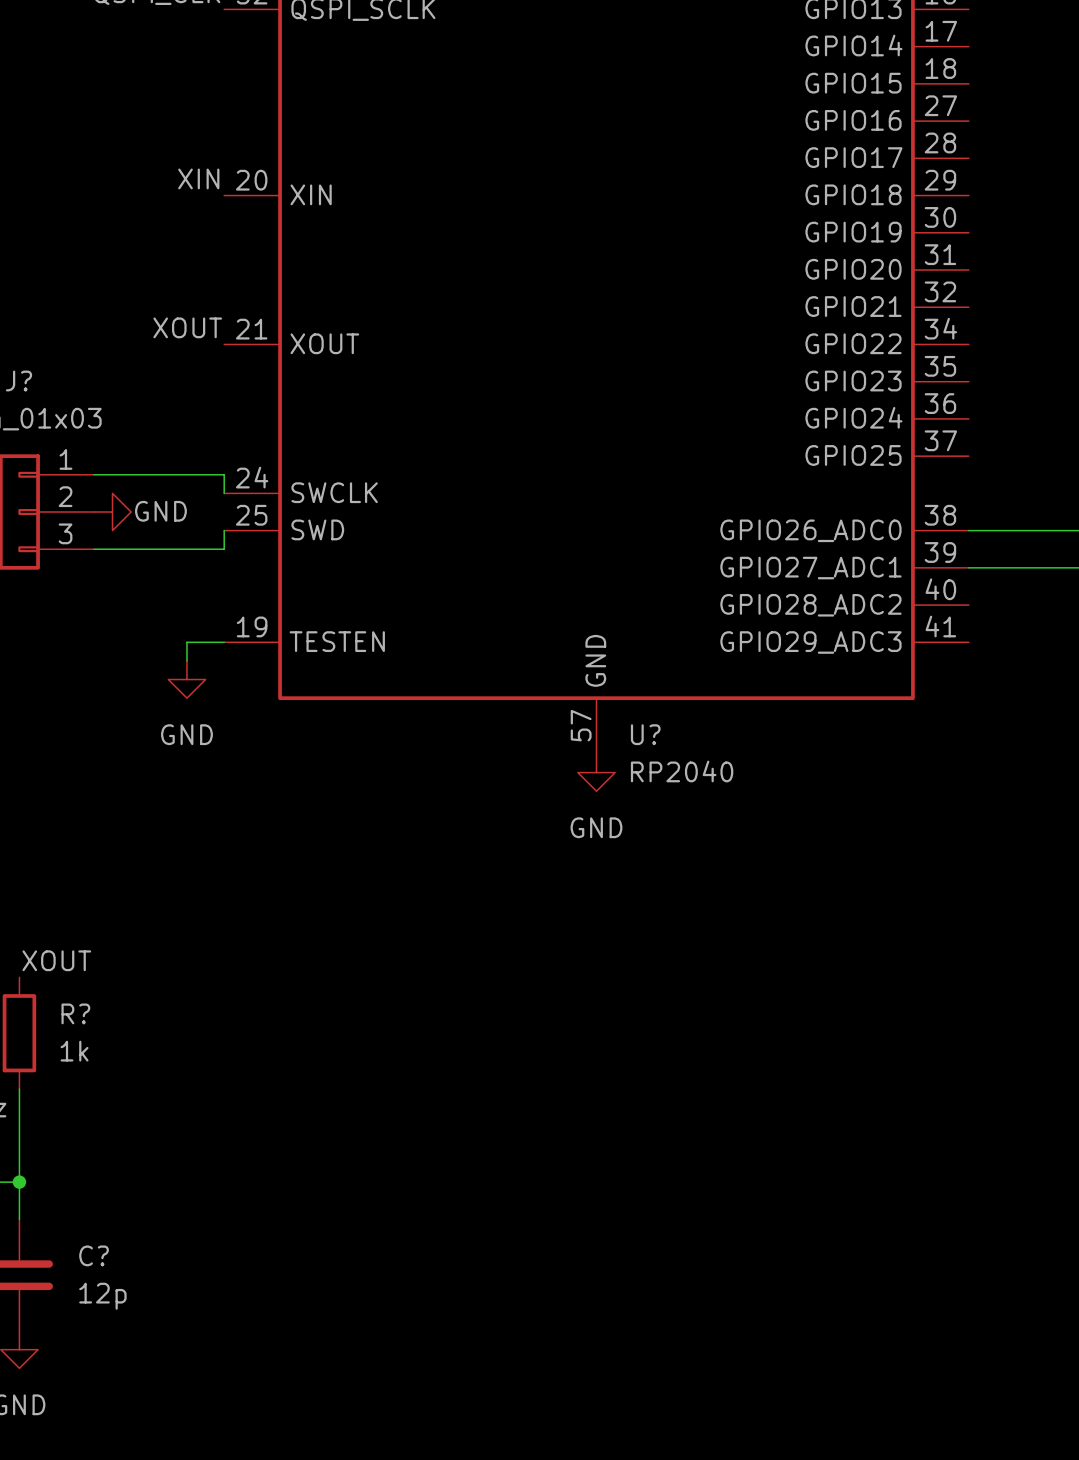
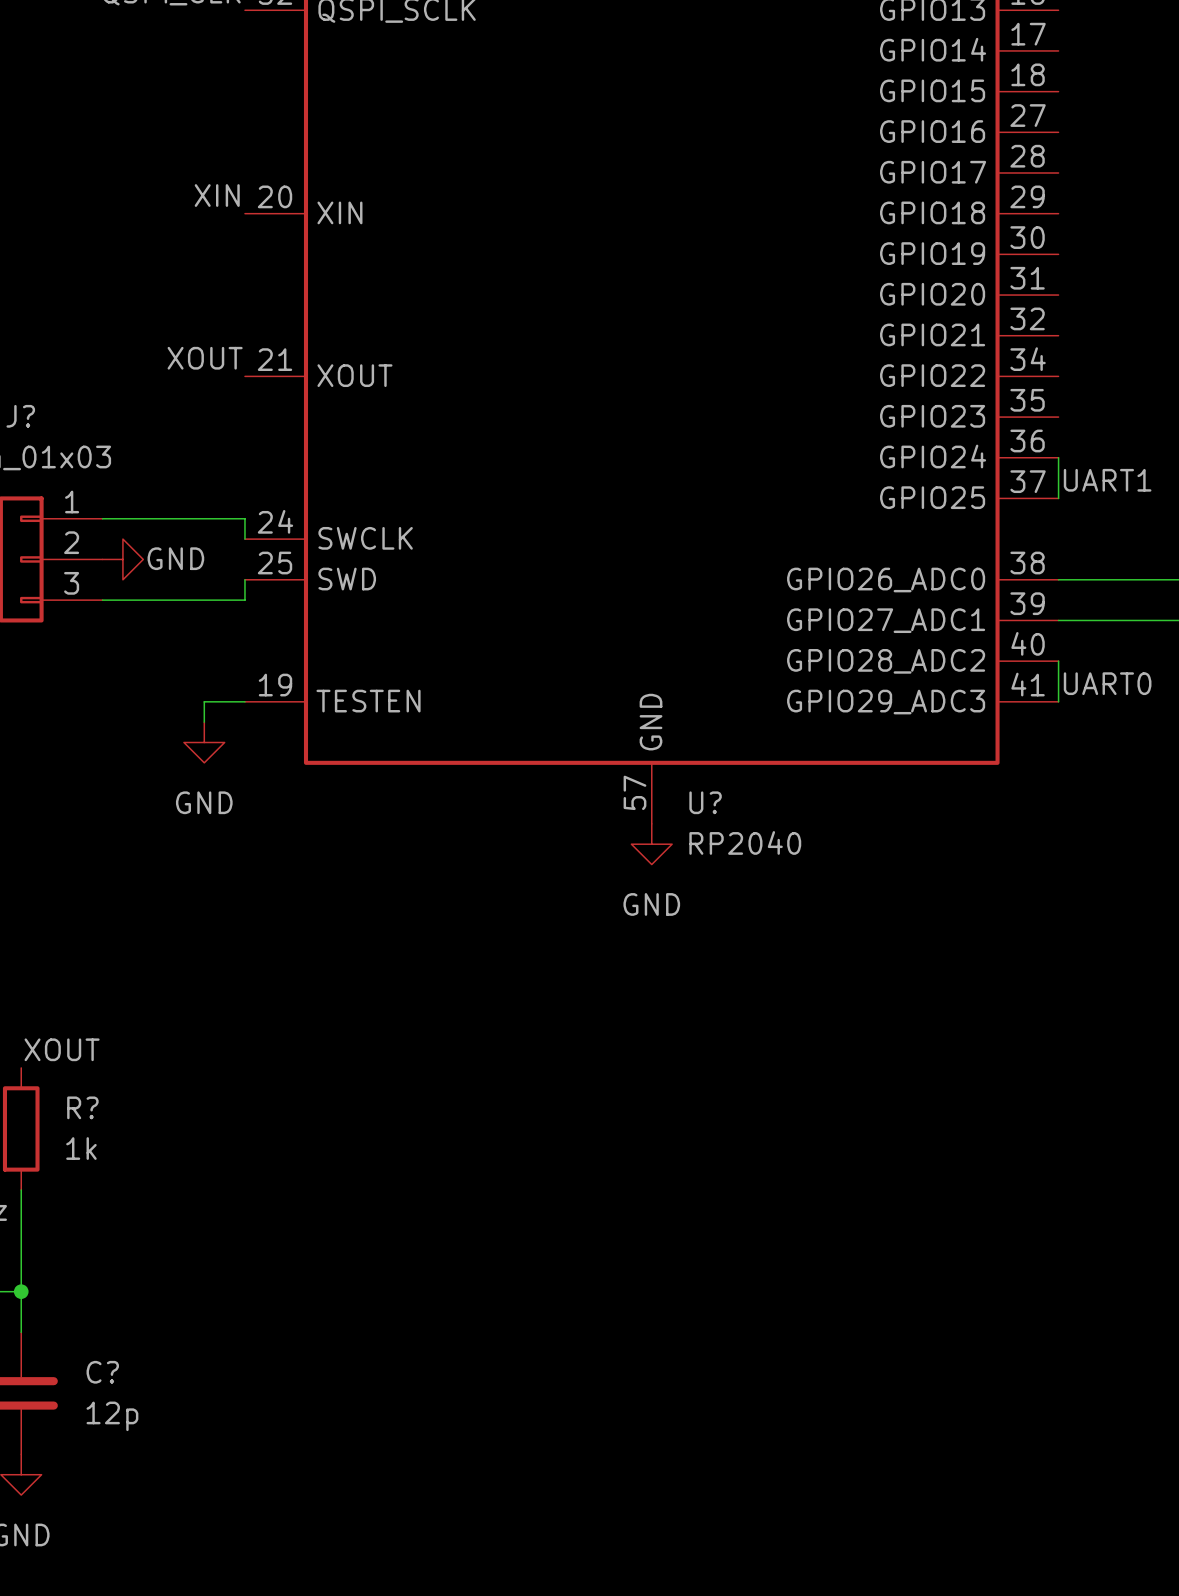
wire: none -> (1058, 457) (1058, 498)
label: none -> UART1 (1107, 480)
wire: none -> (1058, 661) (1058, 701)
label: none -> UART0 (1107, 683)

